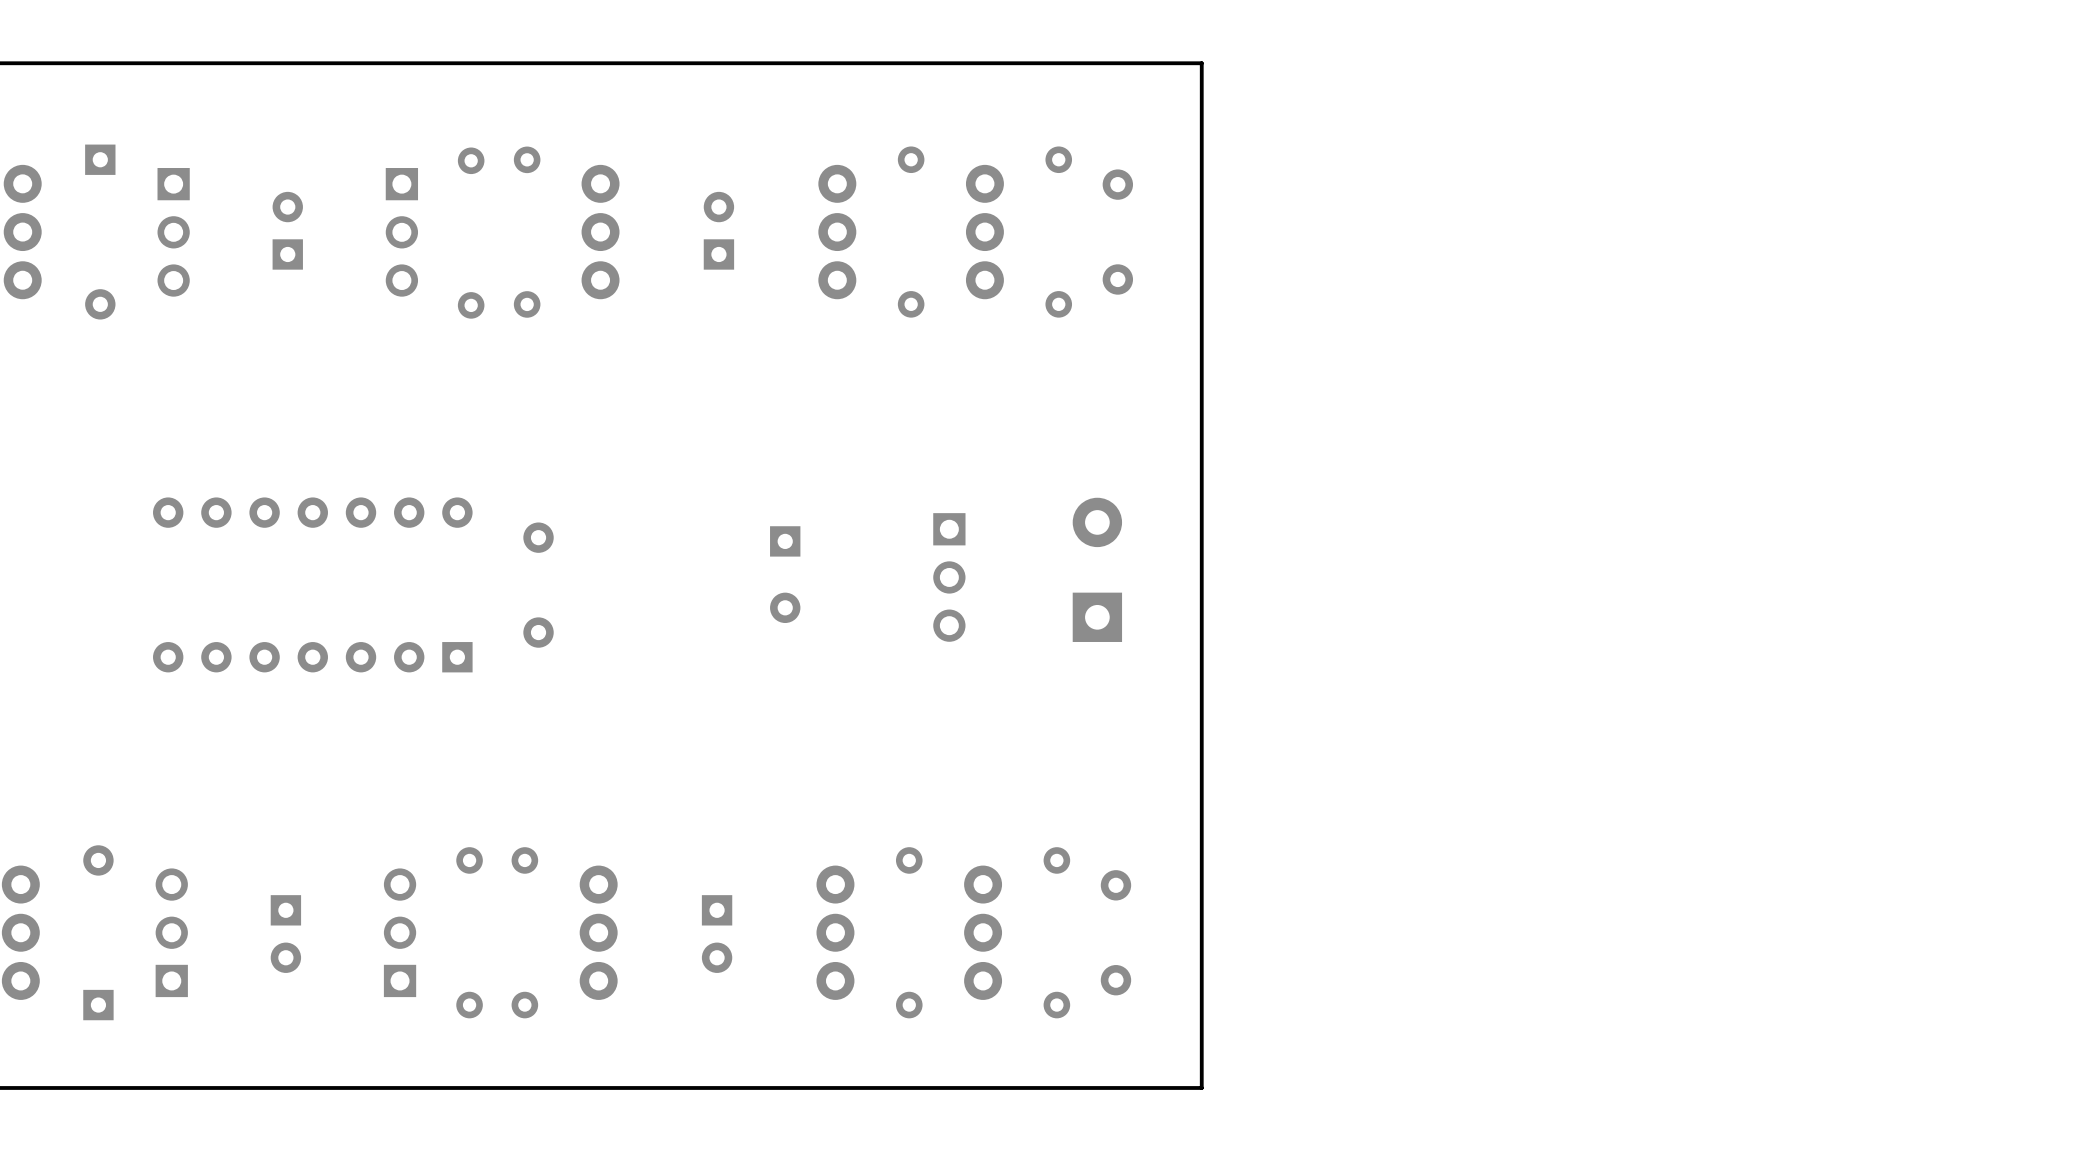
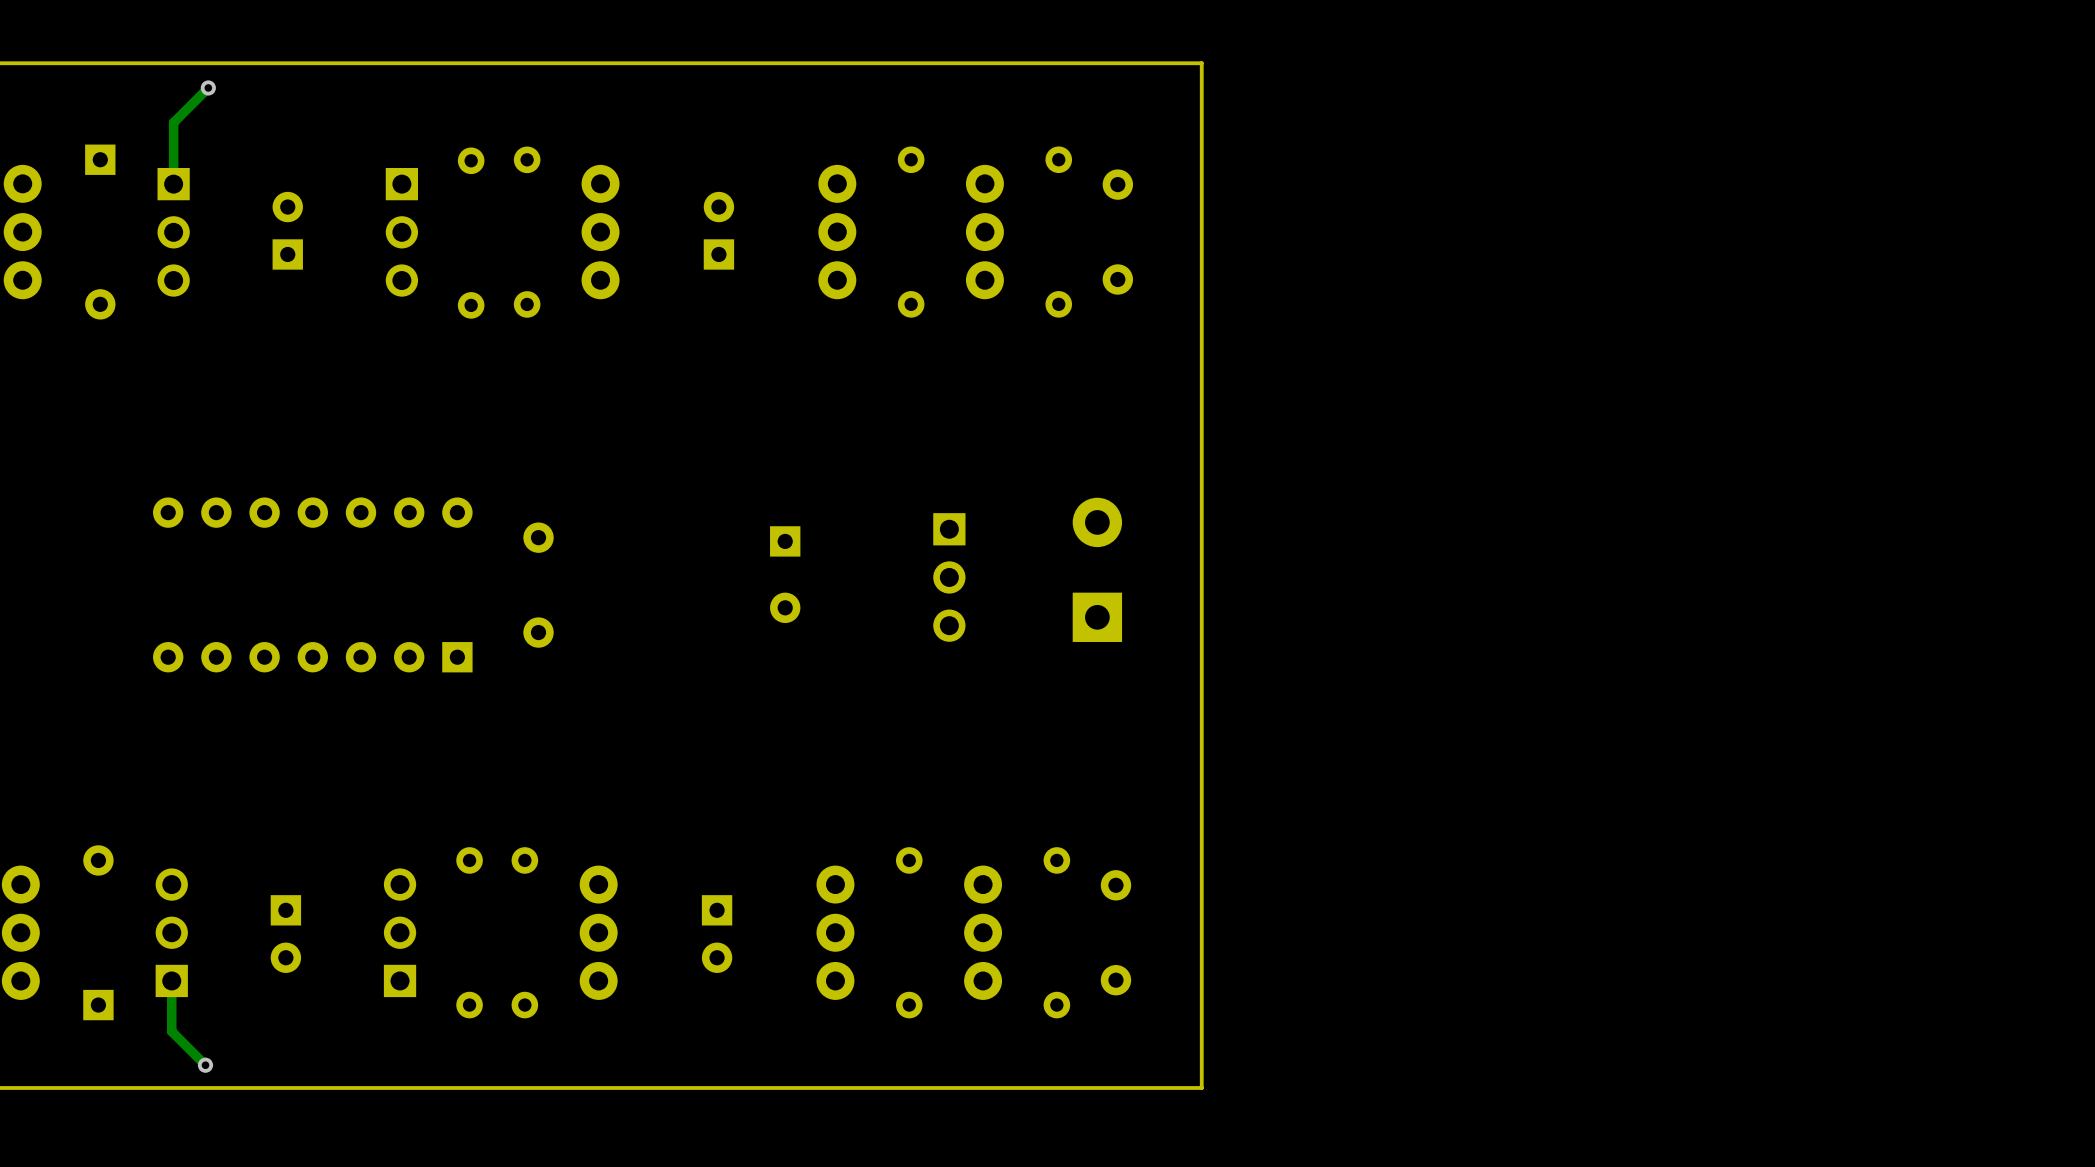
track: none -> (208, 87) (173, 122) (173, 184)
via: none -> (208, 87)
track: none -> (171, 980) (171, 1031) (205, 1065)
via: none -> (205, 1065)

